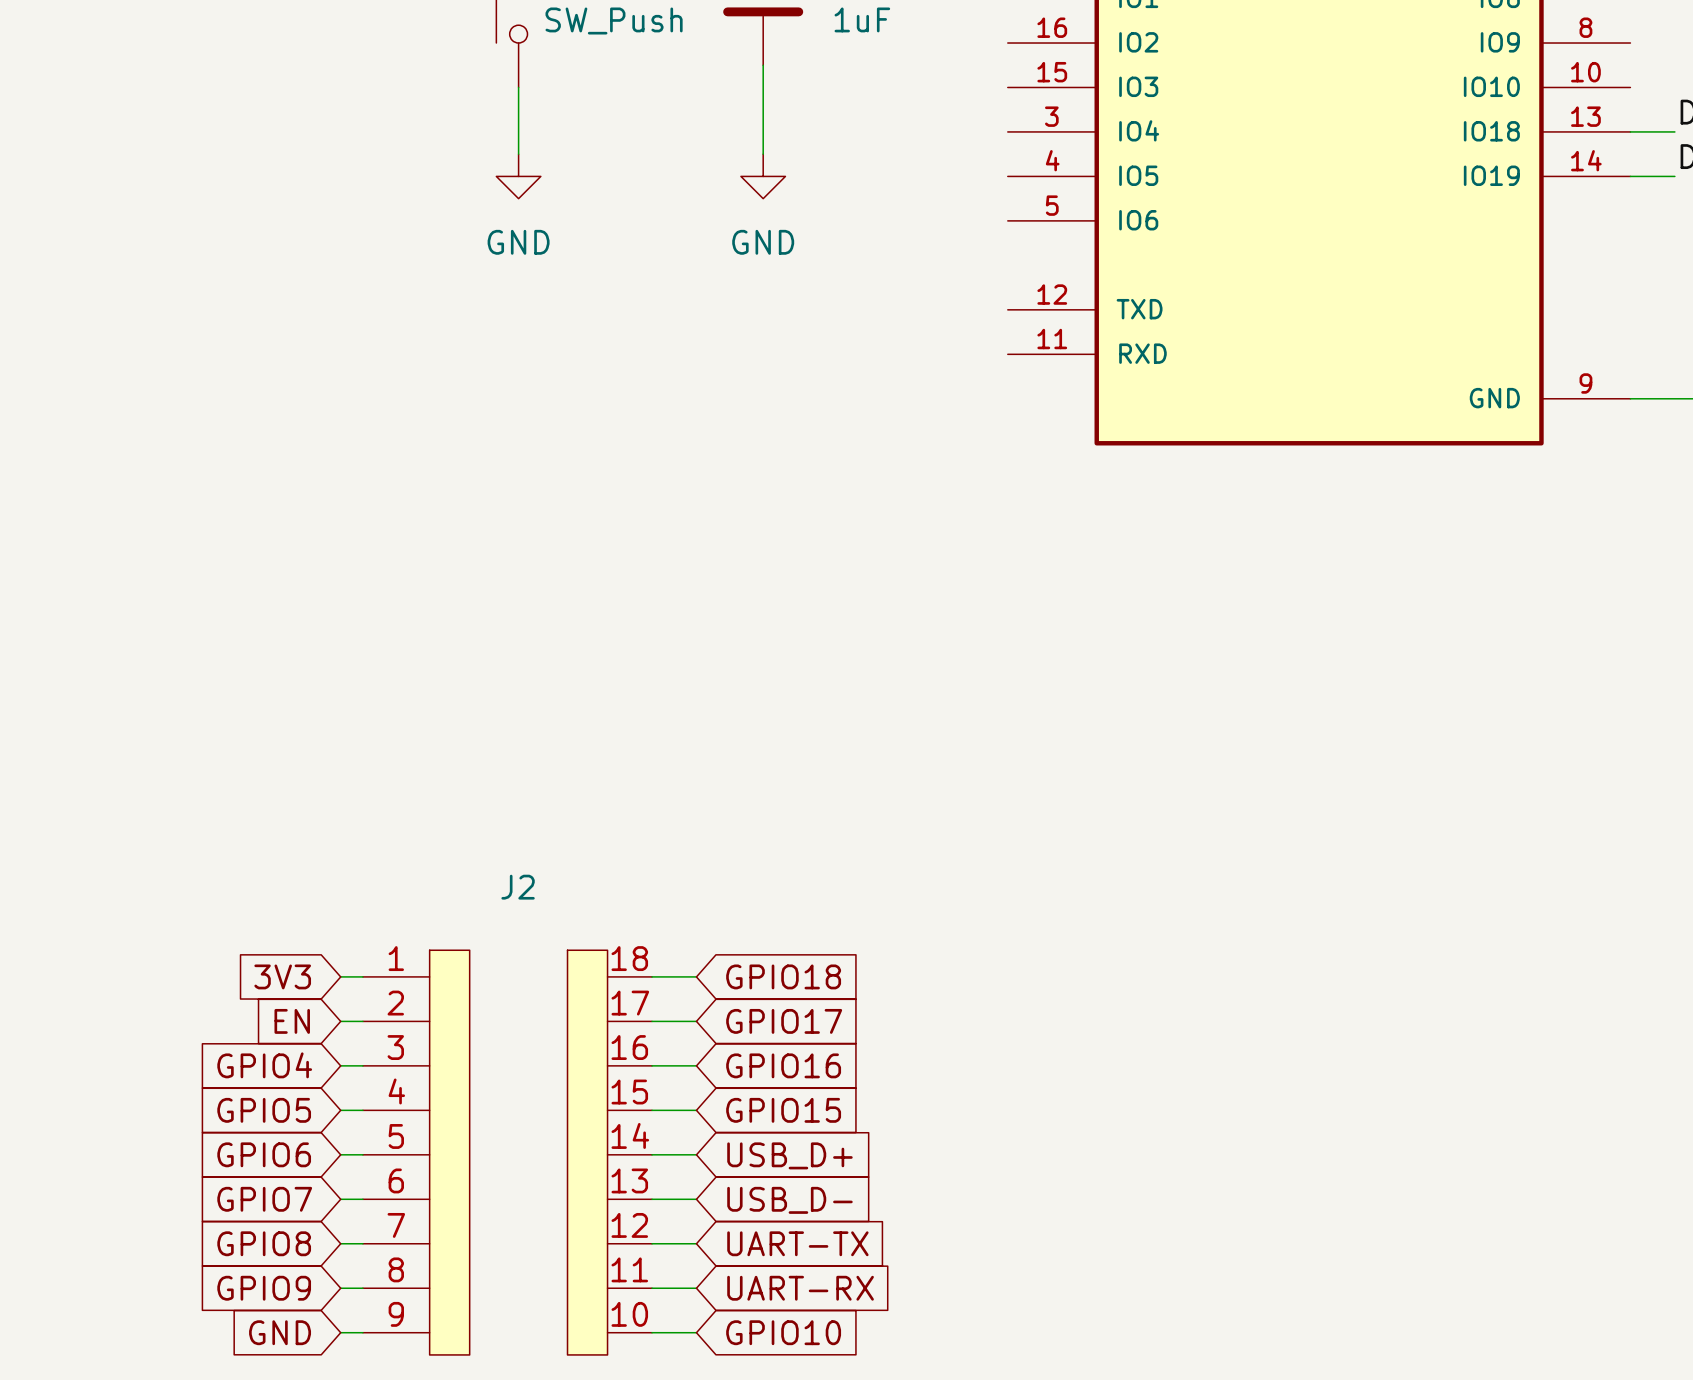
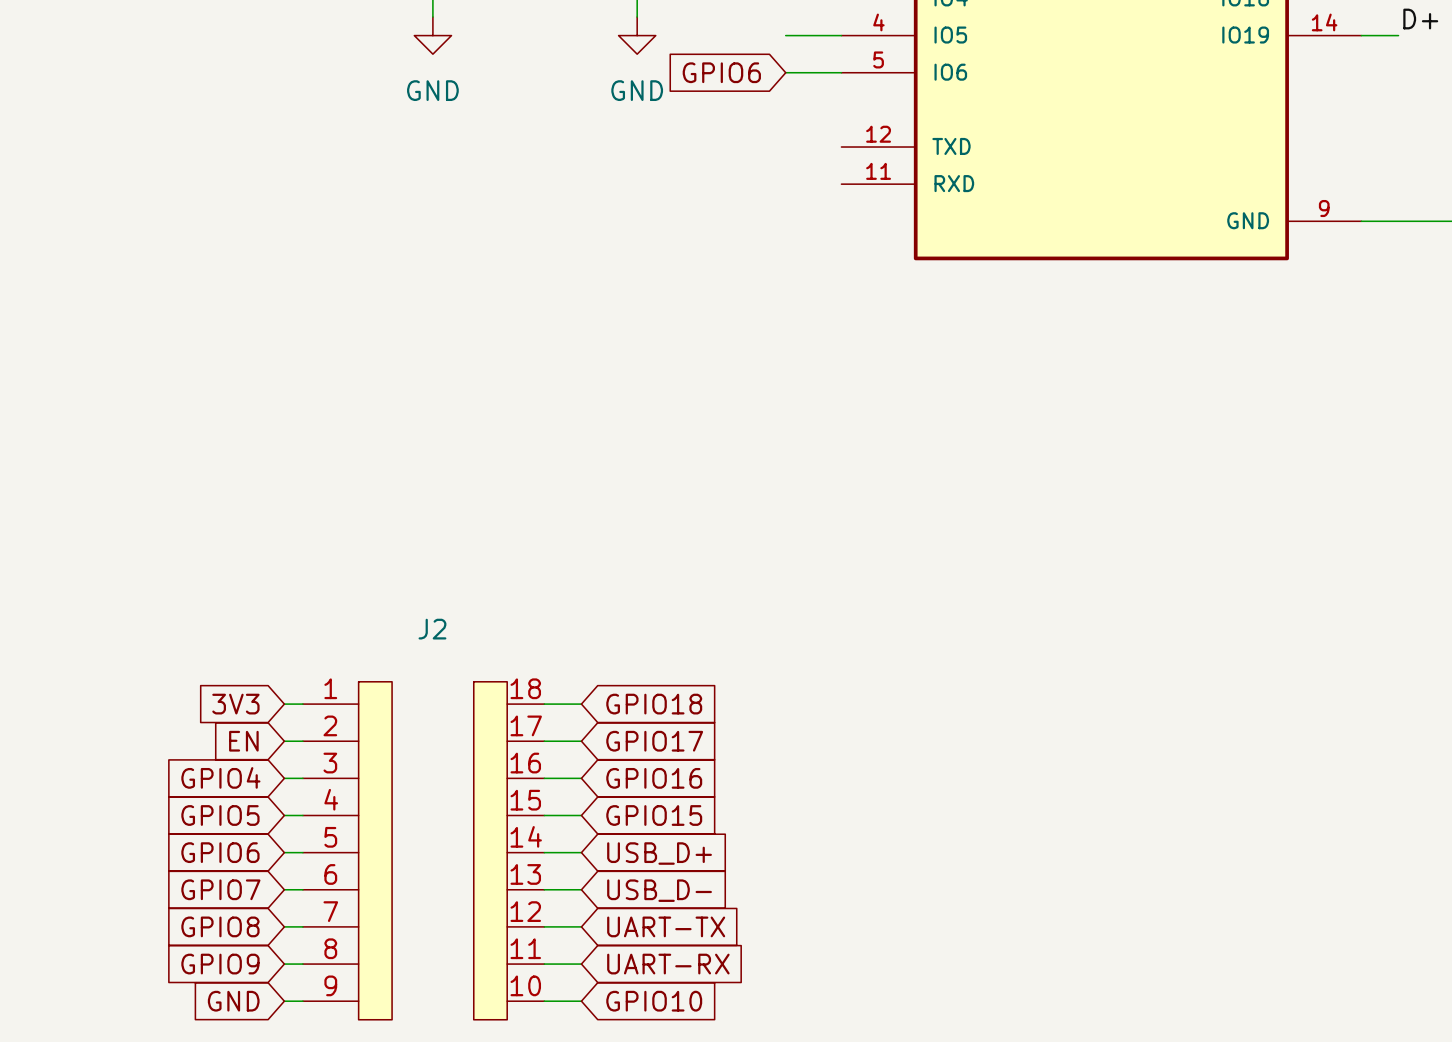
wire: none -> (785, 35) (841, 35)
global label: none -> GPIO6 (721, 72)
wire: none -> (785, 72) (841, 72)

